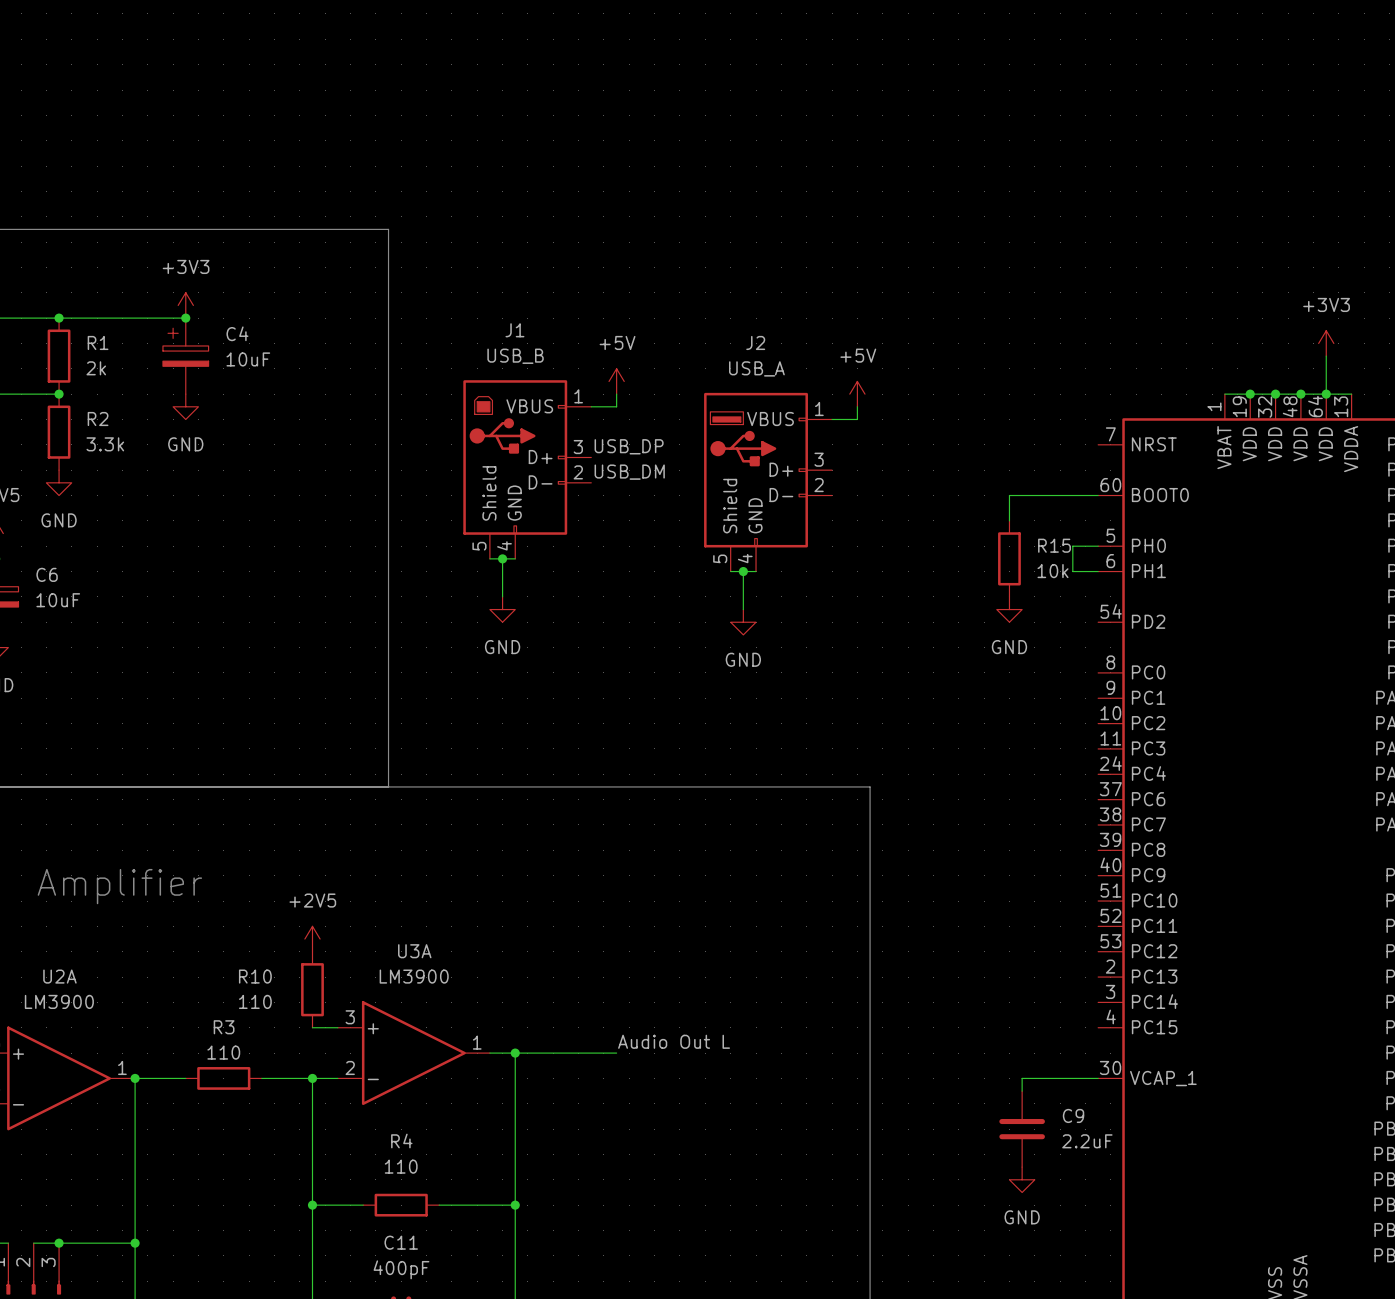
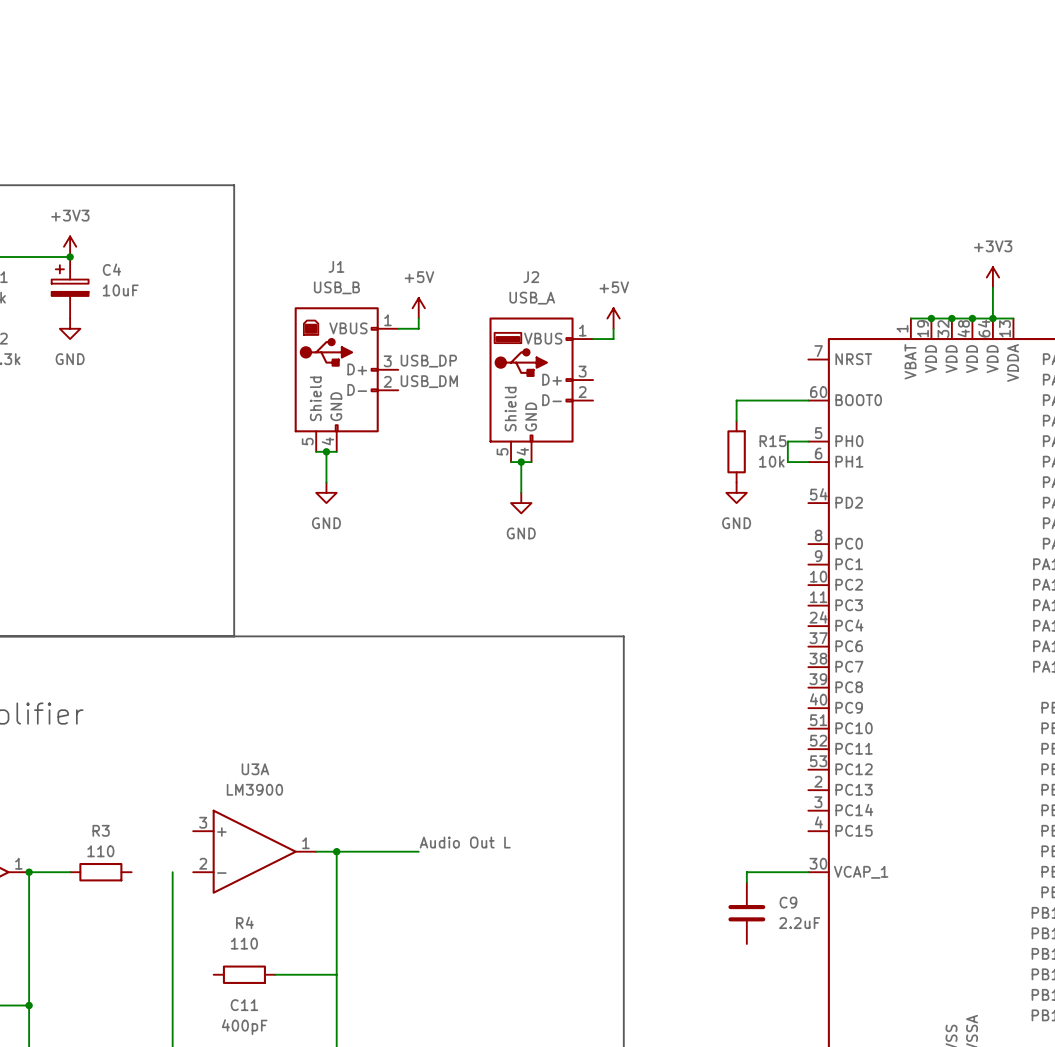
power symbol: +2V5 (312, 939) -> none
R10: 110 (312, 989) -> none
wire: (312, 1027) (337, 1027) -> none
wire: (261, 1078) (337, 1078) -> none
junction: (312, 1078) -> none
power symbol: GND (1022, 1179) -> none
wire: (312, 1205) (363, 1205) -> none
junction: (312, 1205) -> none
junction: (515, 1205) -> none

